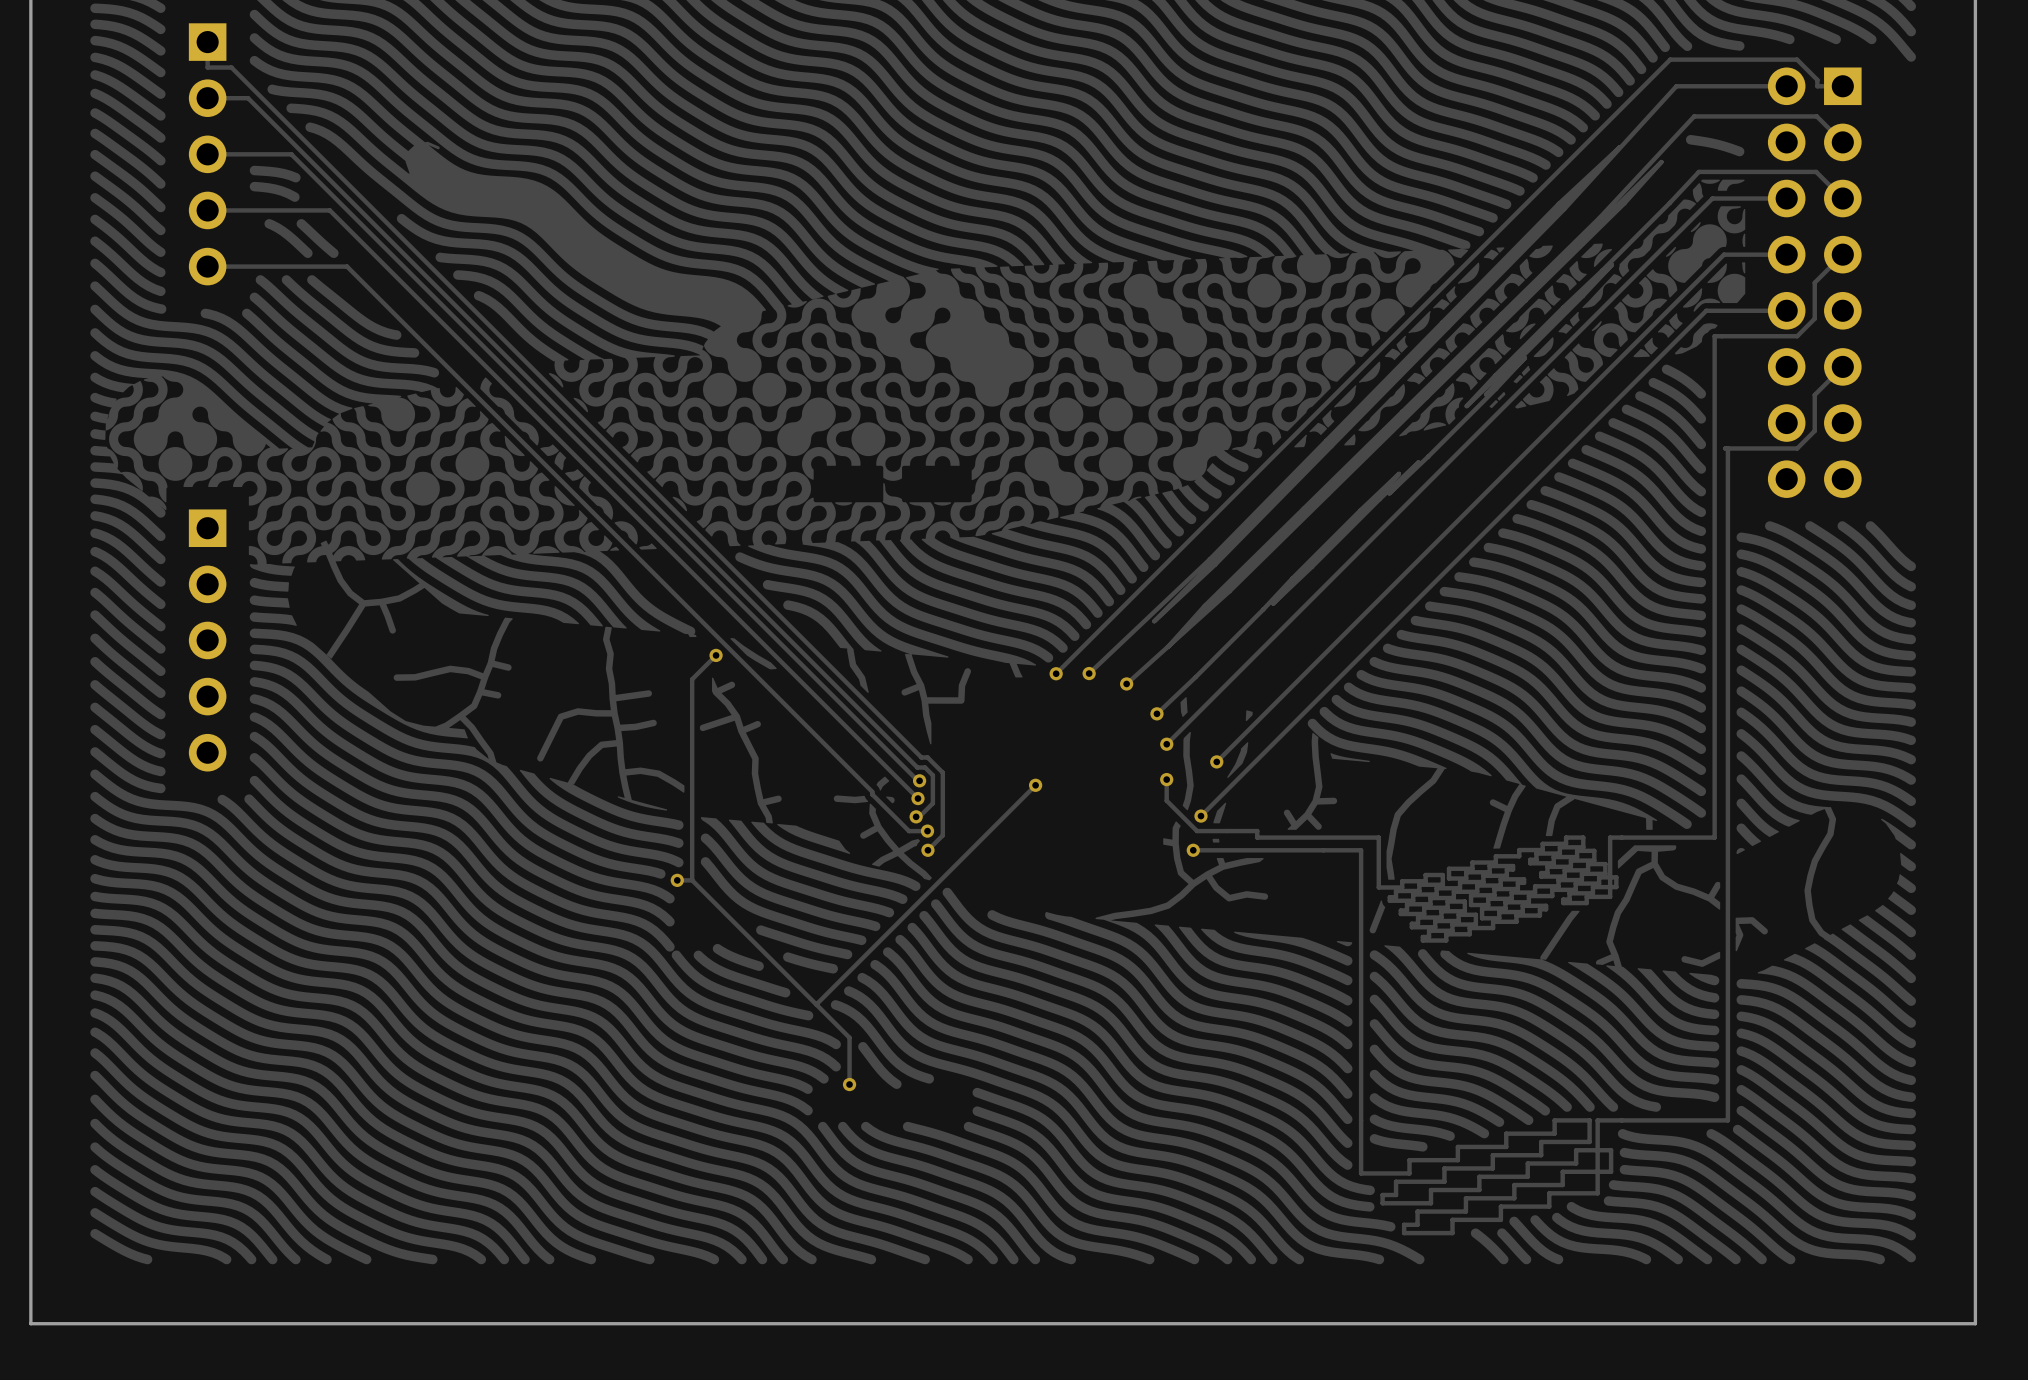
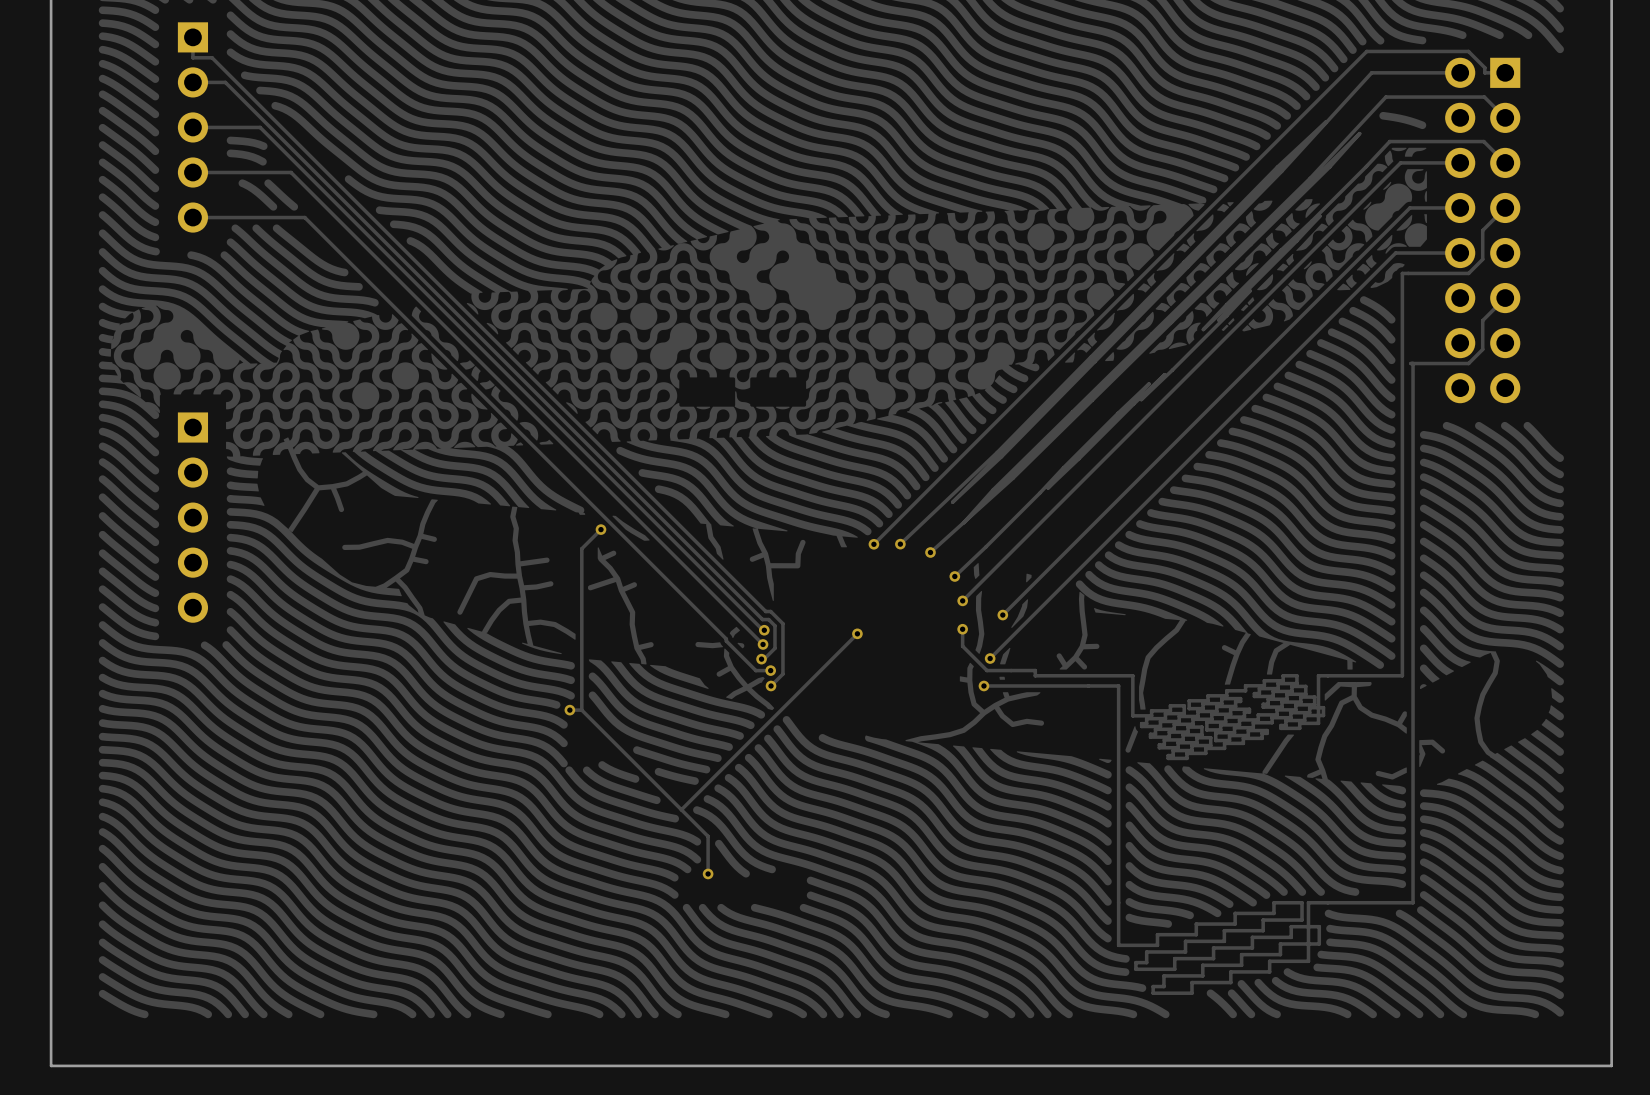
drawing shape: [249, 55, 766, 382] -> [226, 48, 641, 311]
drawing: none -> [240, 71, 627, 259]

